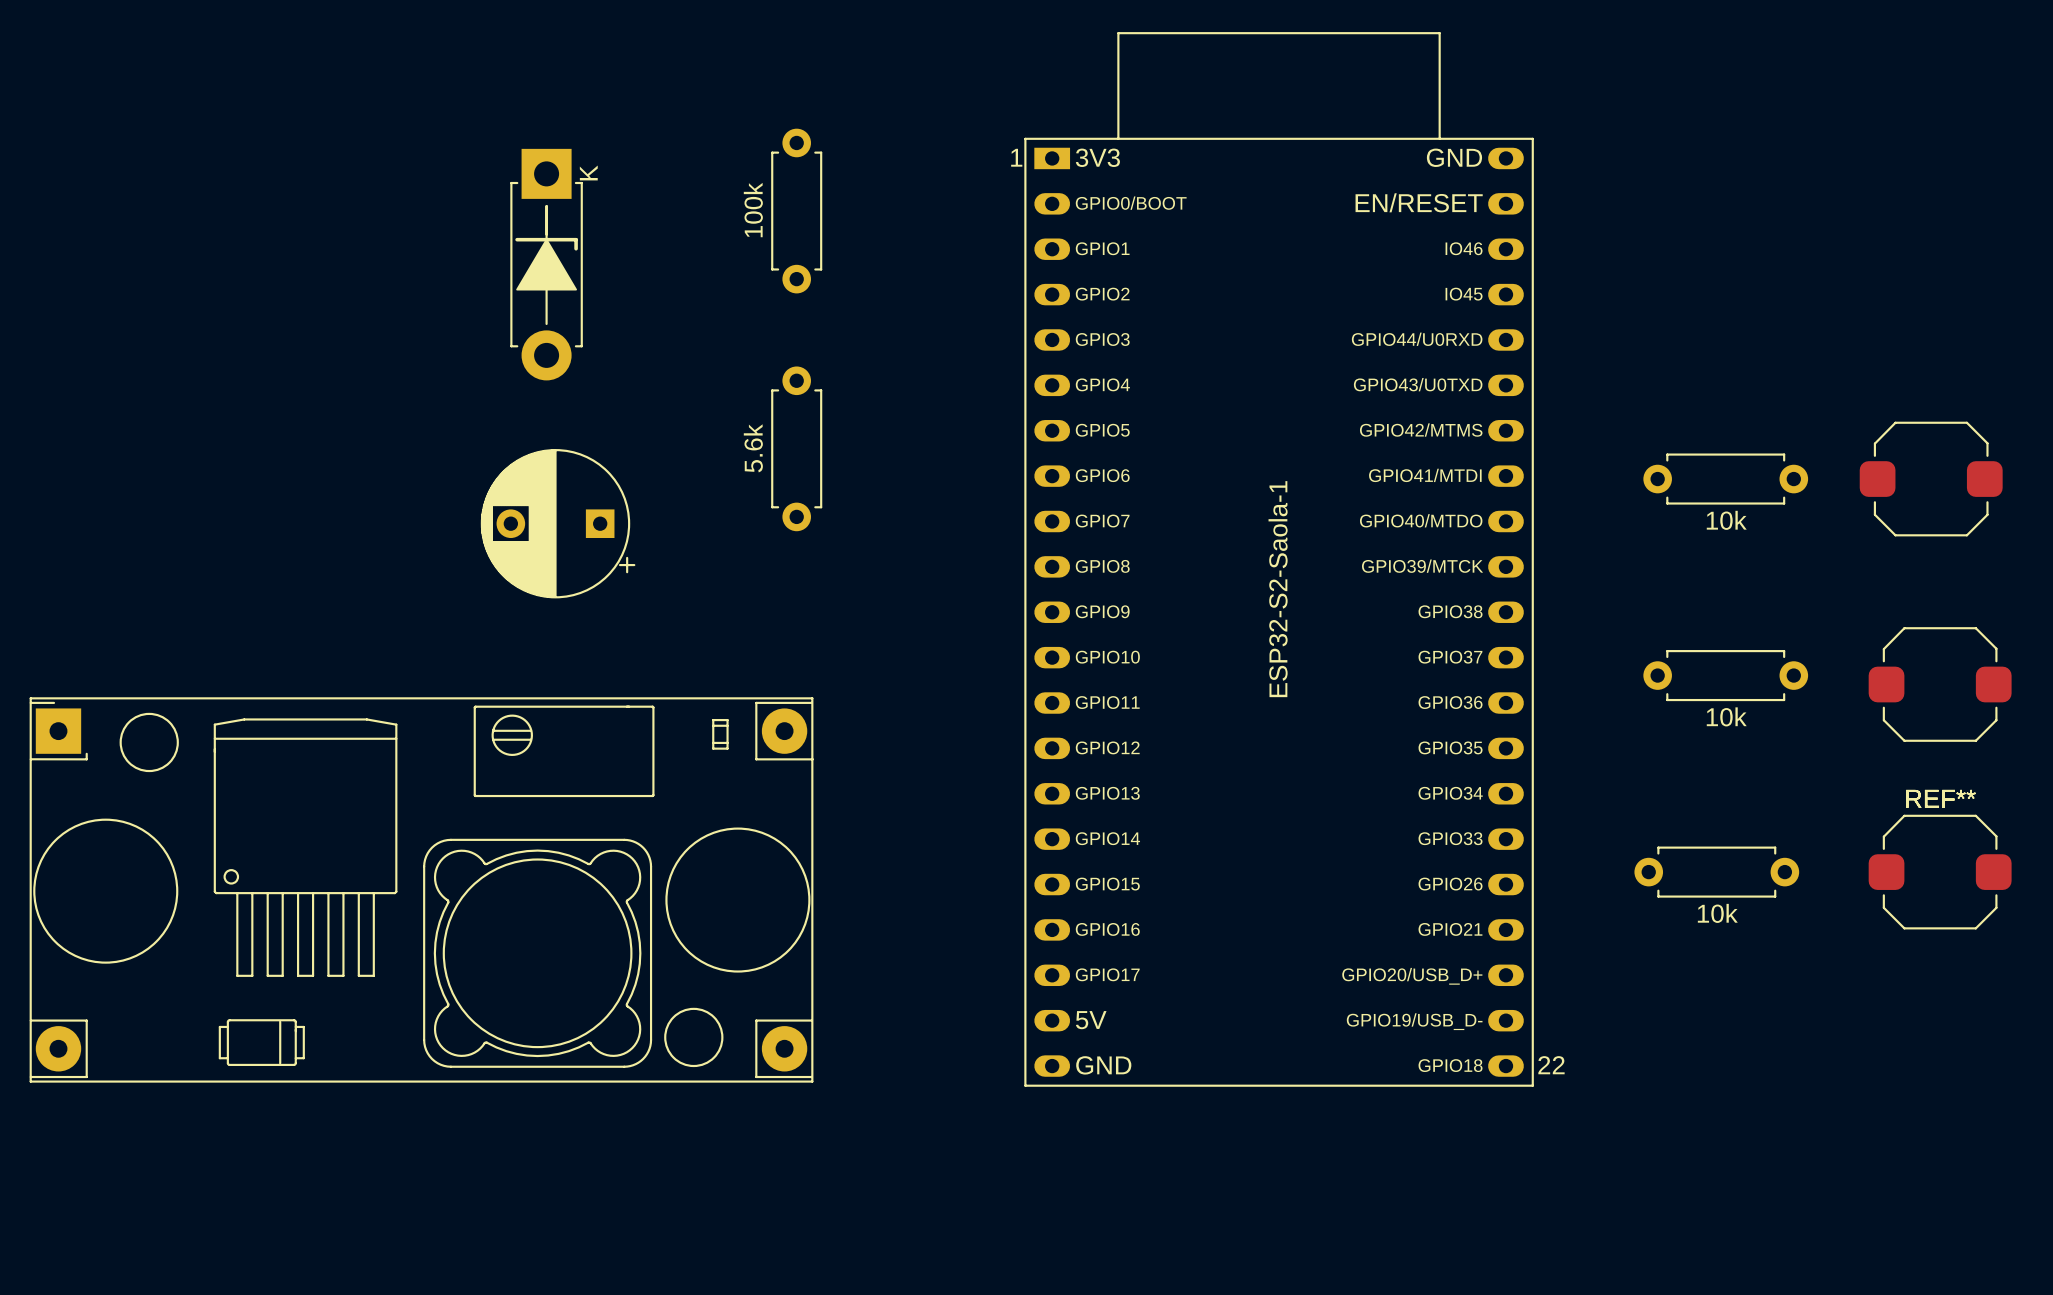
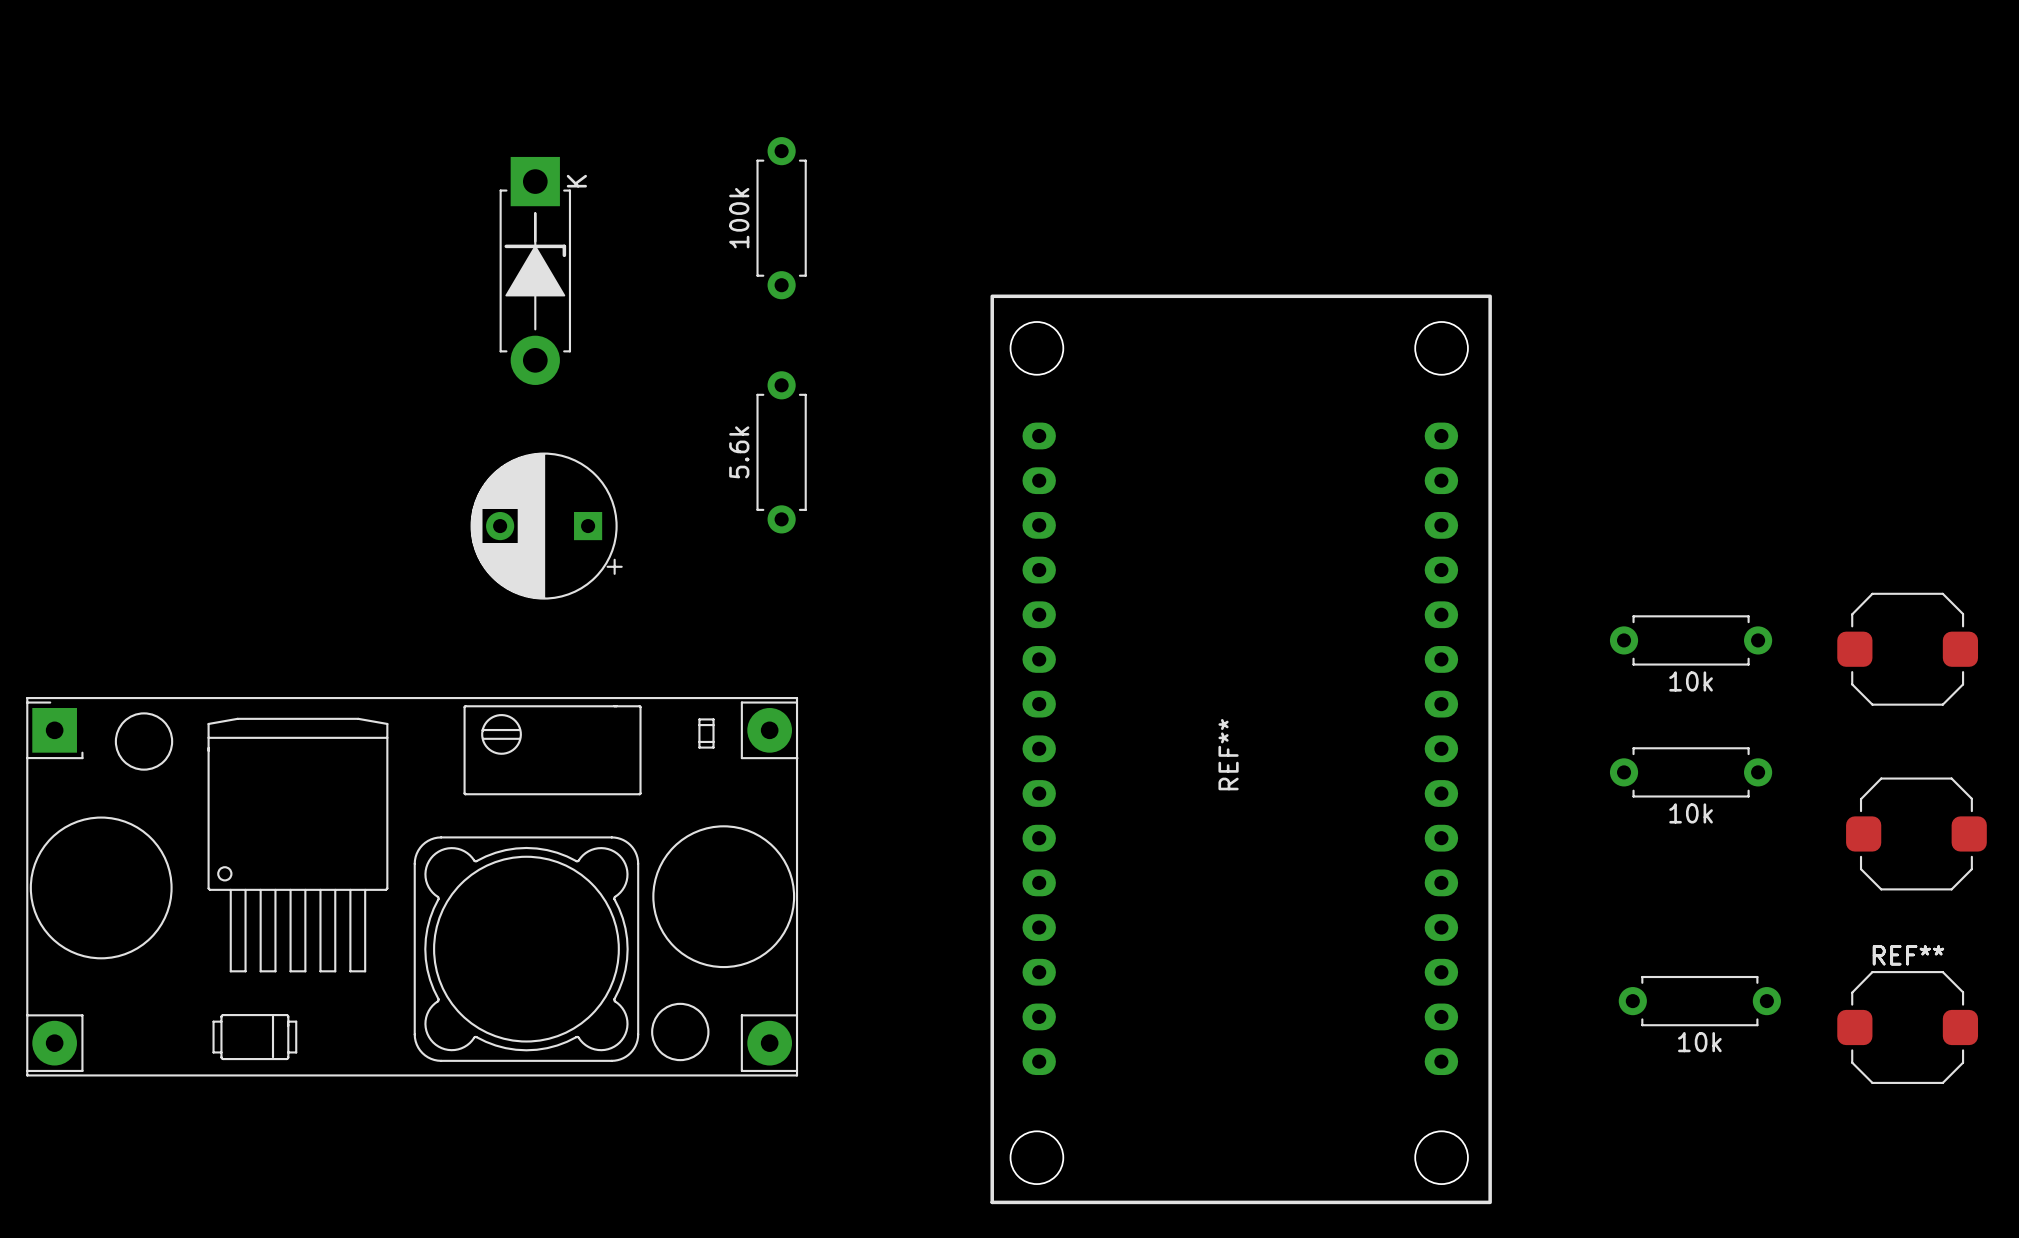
10k: (1725, 479) -> none
part: (1931, 479) -> none
part: ESP32-S2-Saola-1 (1279, 559) -> none
10k position: (1725, 675) -> (1691, 640)
part position: (1940, 684) -> (1907, 649)
REF**: none -> (1241, 749)
10k: none -> (1691, 772)
part: none -> (1916, 833)
10k: (1716, 872) -> none
part position: (1940, 872) -> (1907, 1027)
10k: none -> (1699, 1001)

